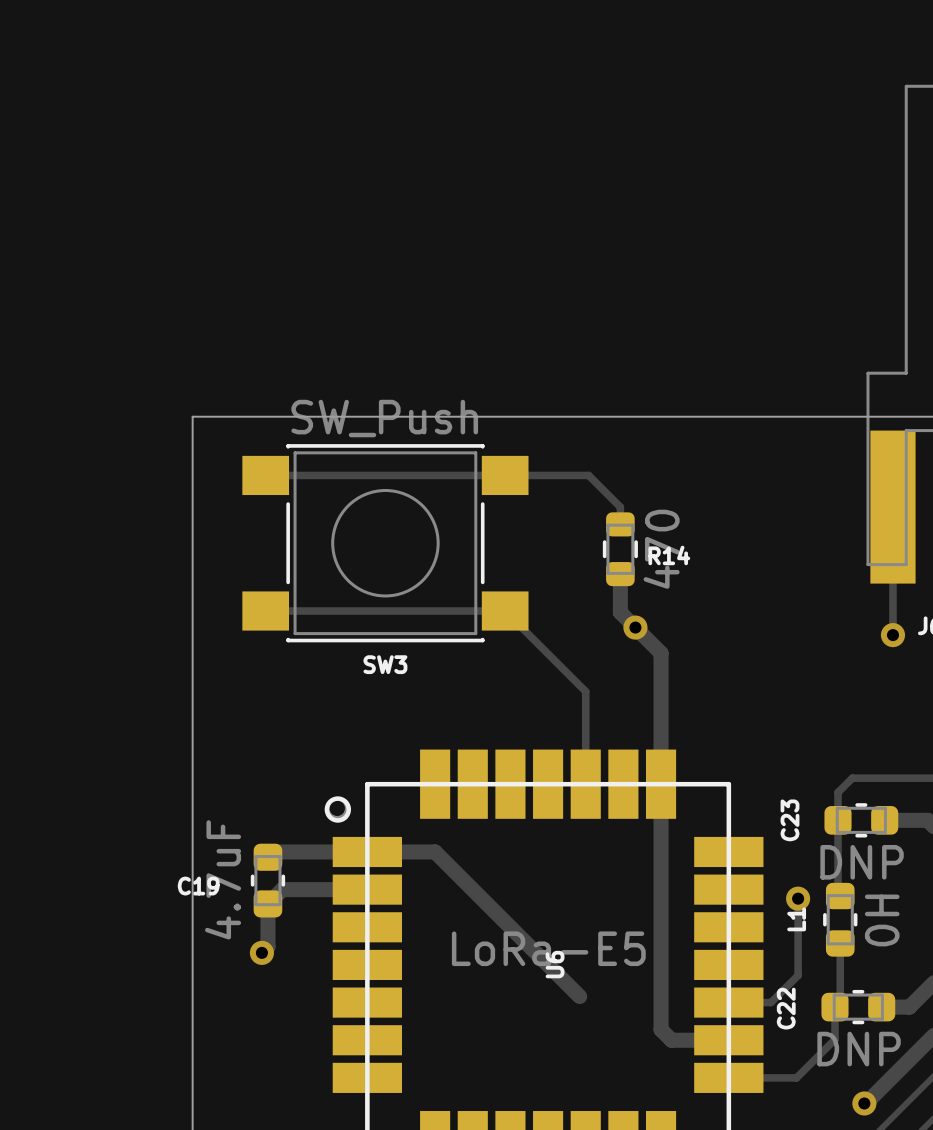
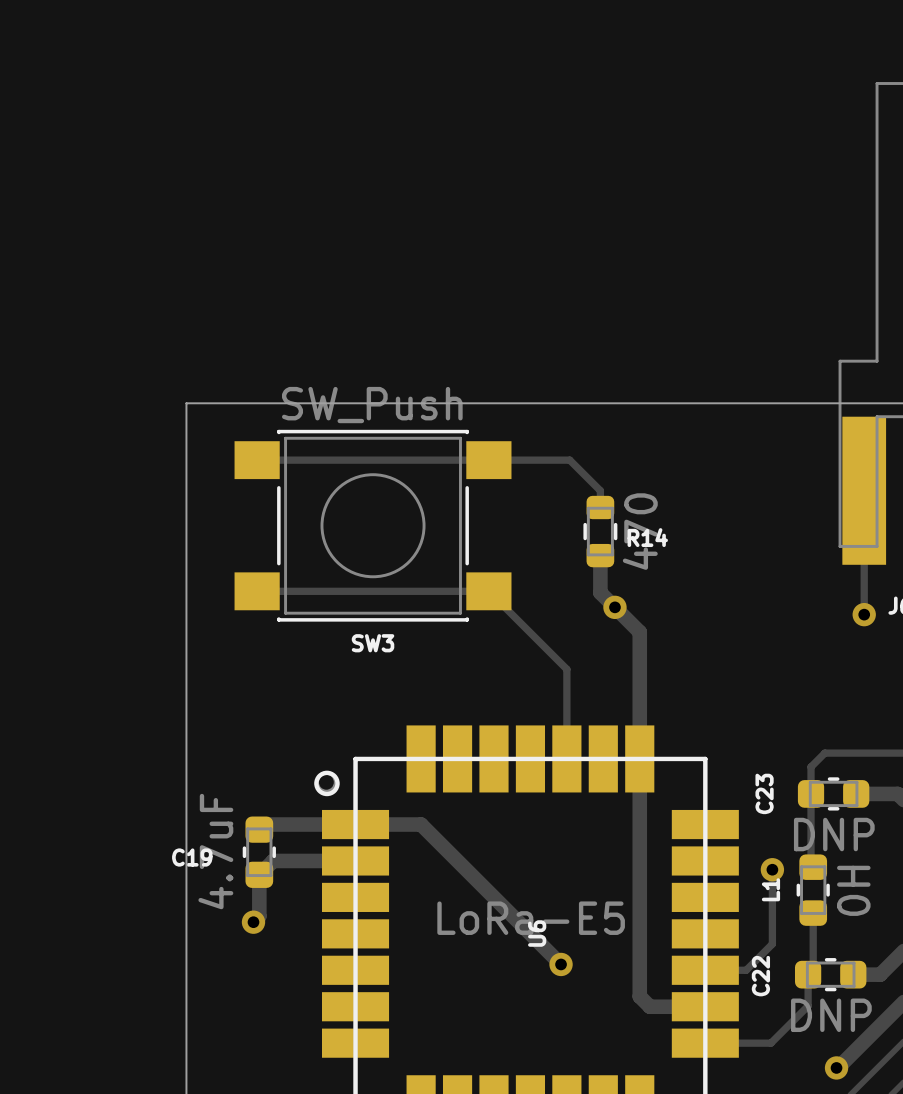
via: none -> (561, 964)

